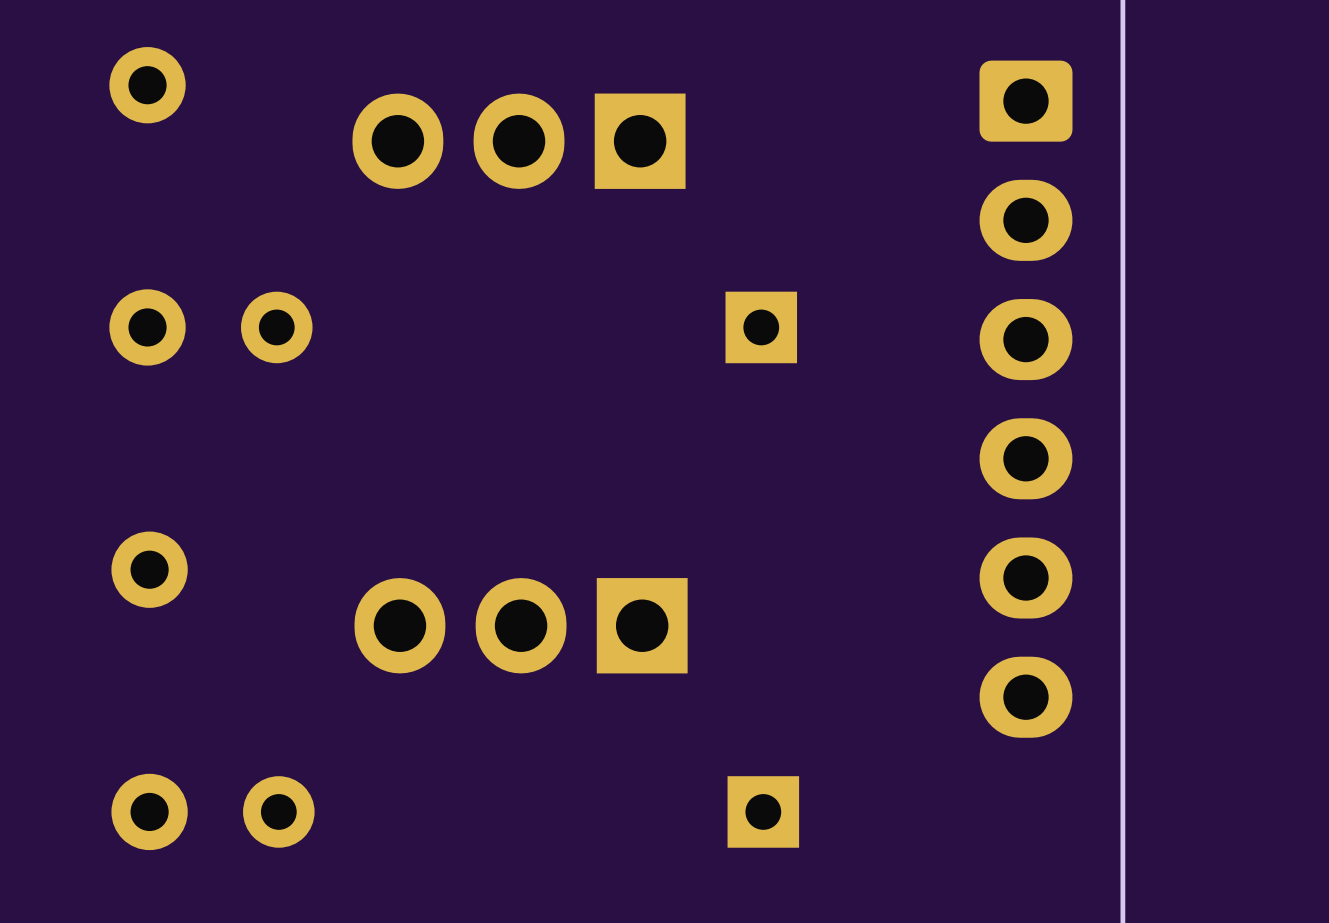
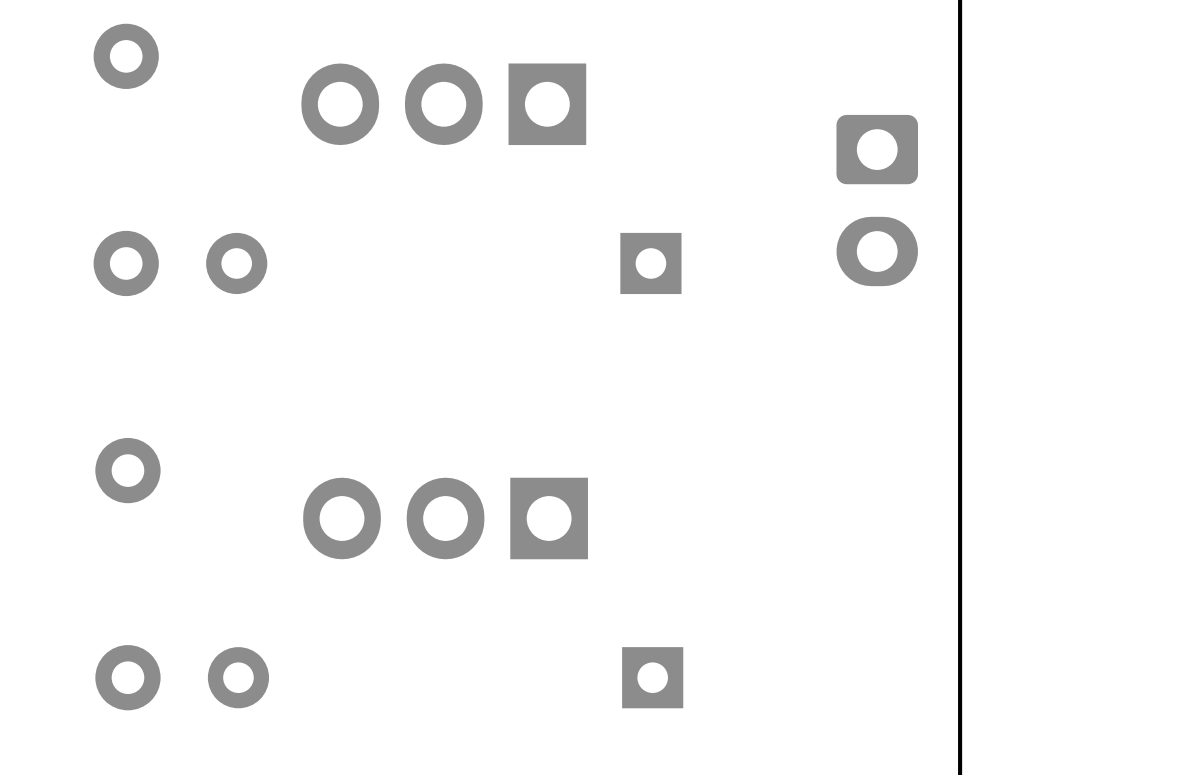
part: none -> (877, 200)
part: (1025, 399) -> none

